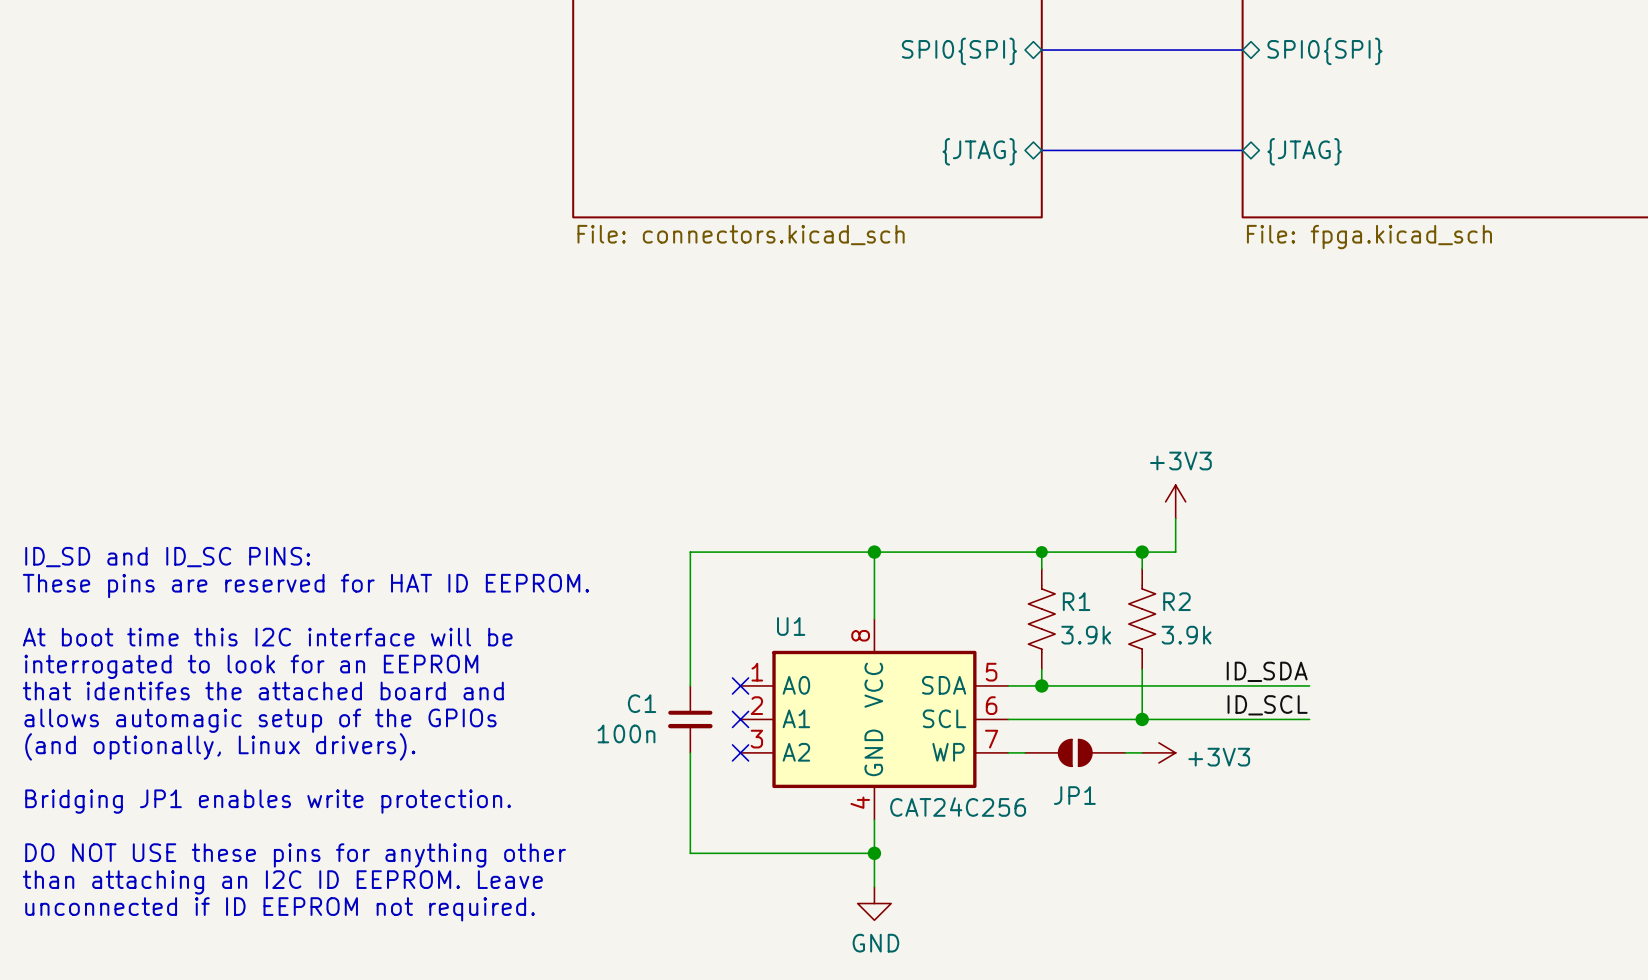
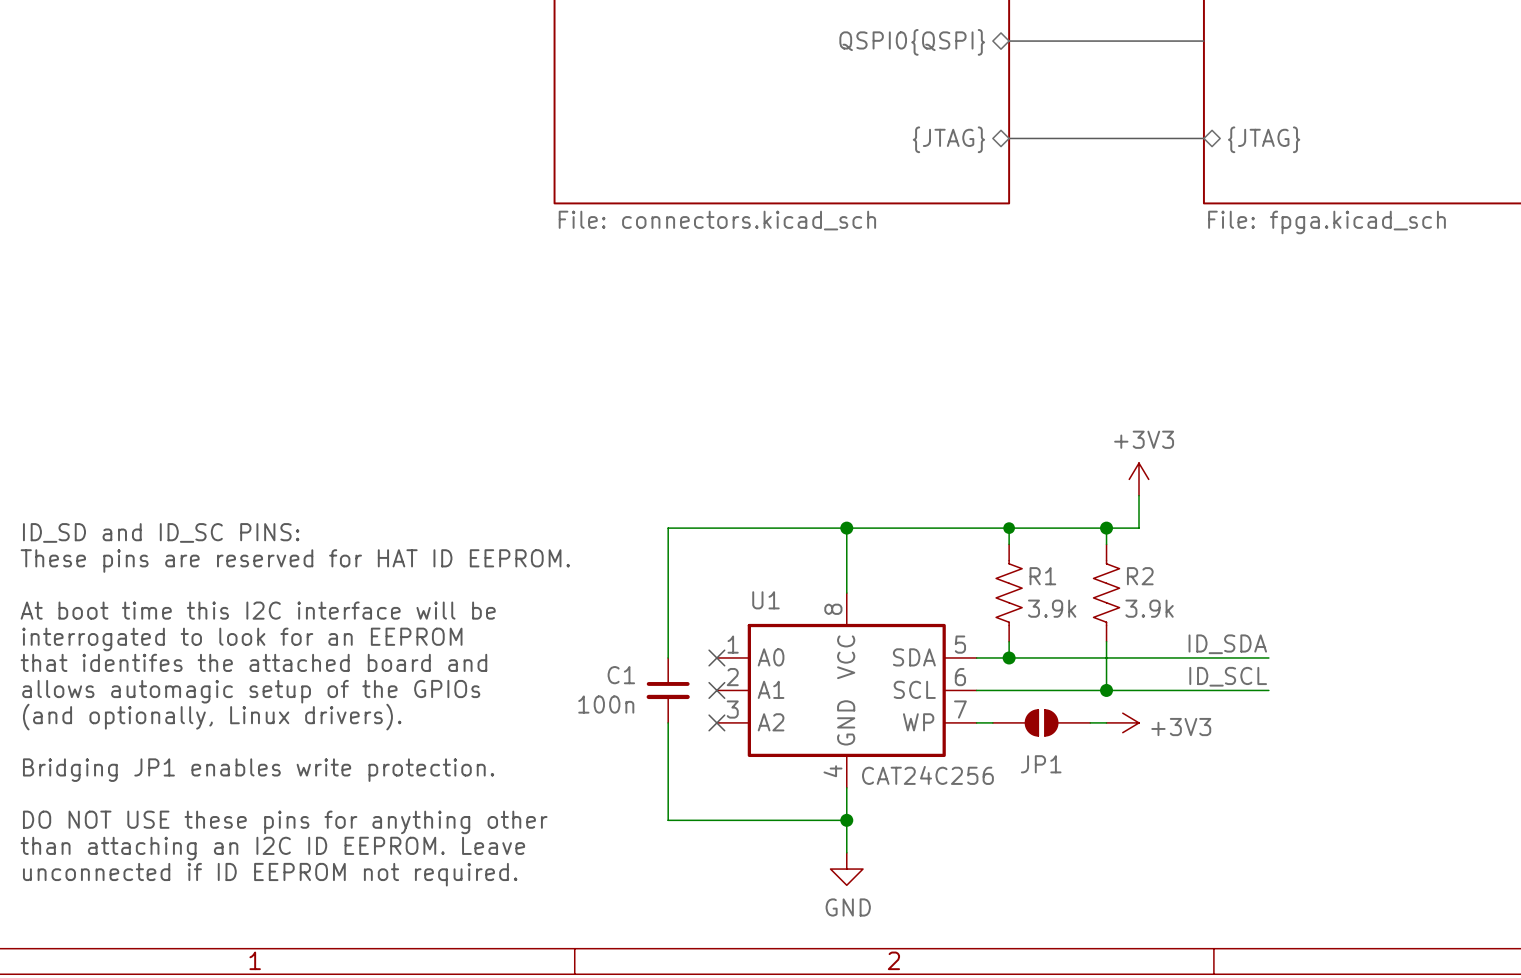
sheet pin: SPI0{SPI} (959, 51) -> QSPI0{QSPI} (912, 42)
sheet pin: SPI0{SPI} (1324, 51) -> none

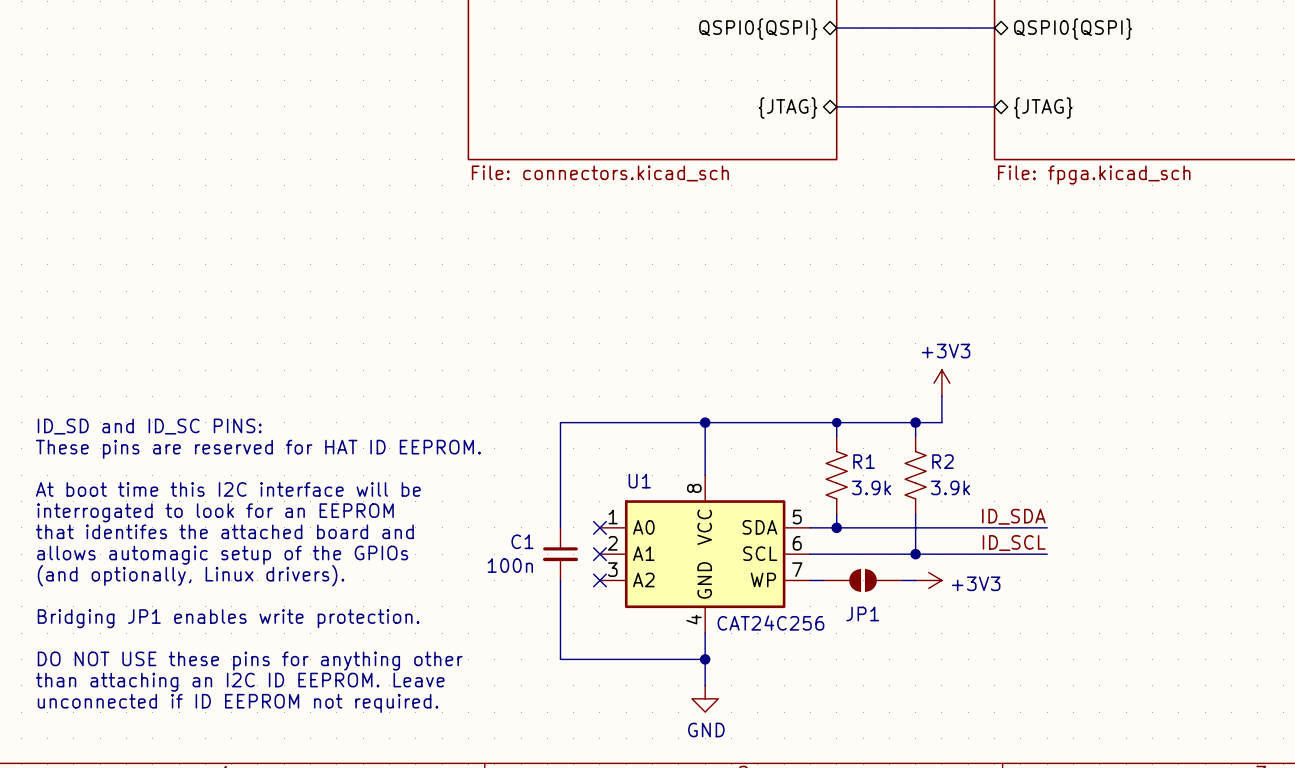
sheet pin: none -> QSPI0{QSPI} (1073, 29)

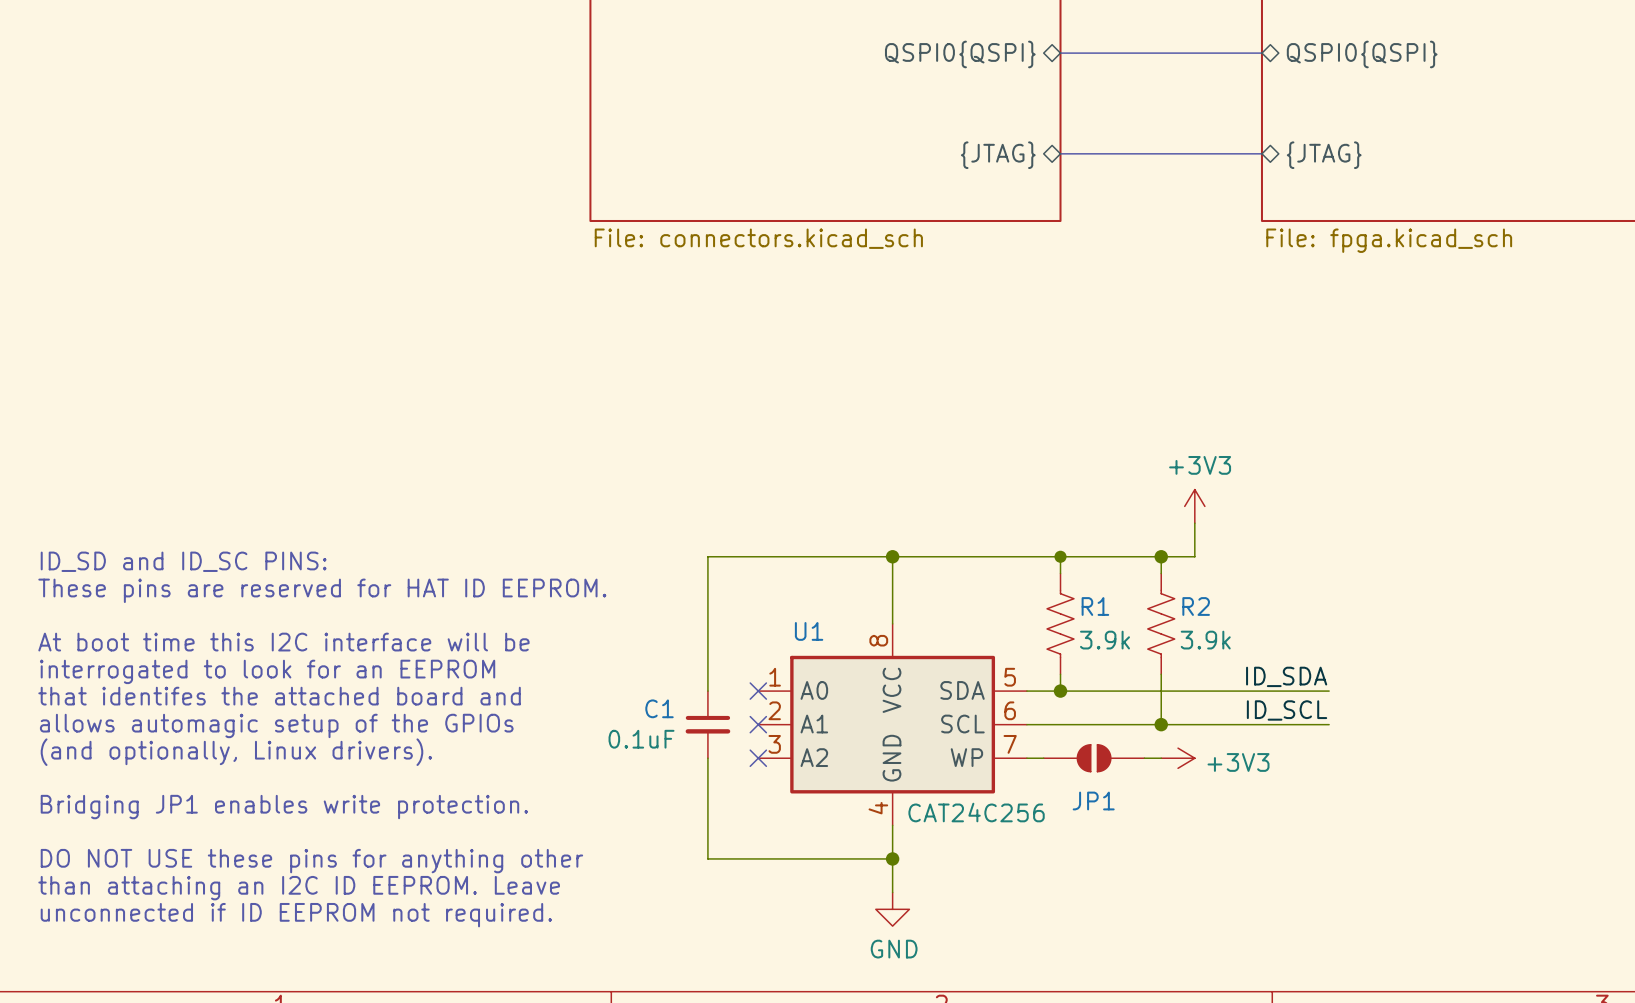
C1 value: 100n (510, 565) -> 0.1uF (641, 739)

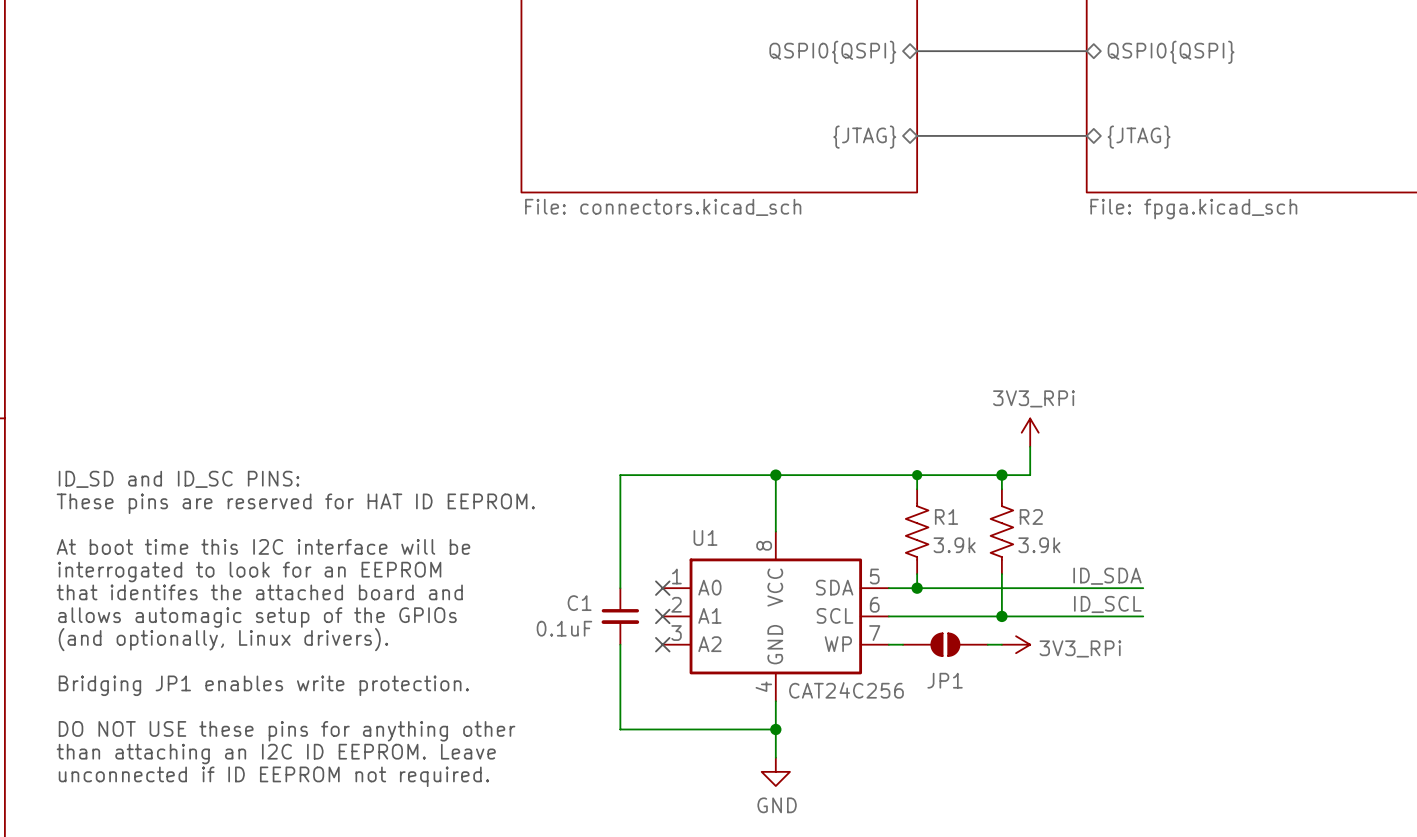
power symbol: +3V3 (1194, 506) -> 3V3_RPi (1030, 432)
power symbol: +3V3 (1178, 758) -> 3V3_RPi (1016, 644)

